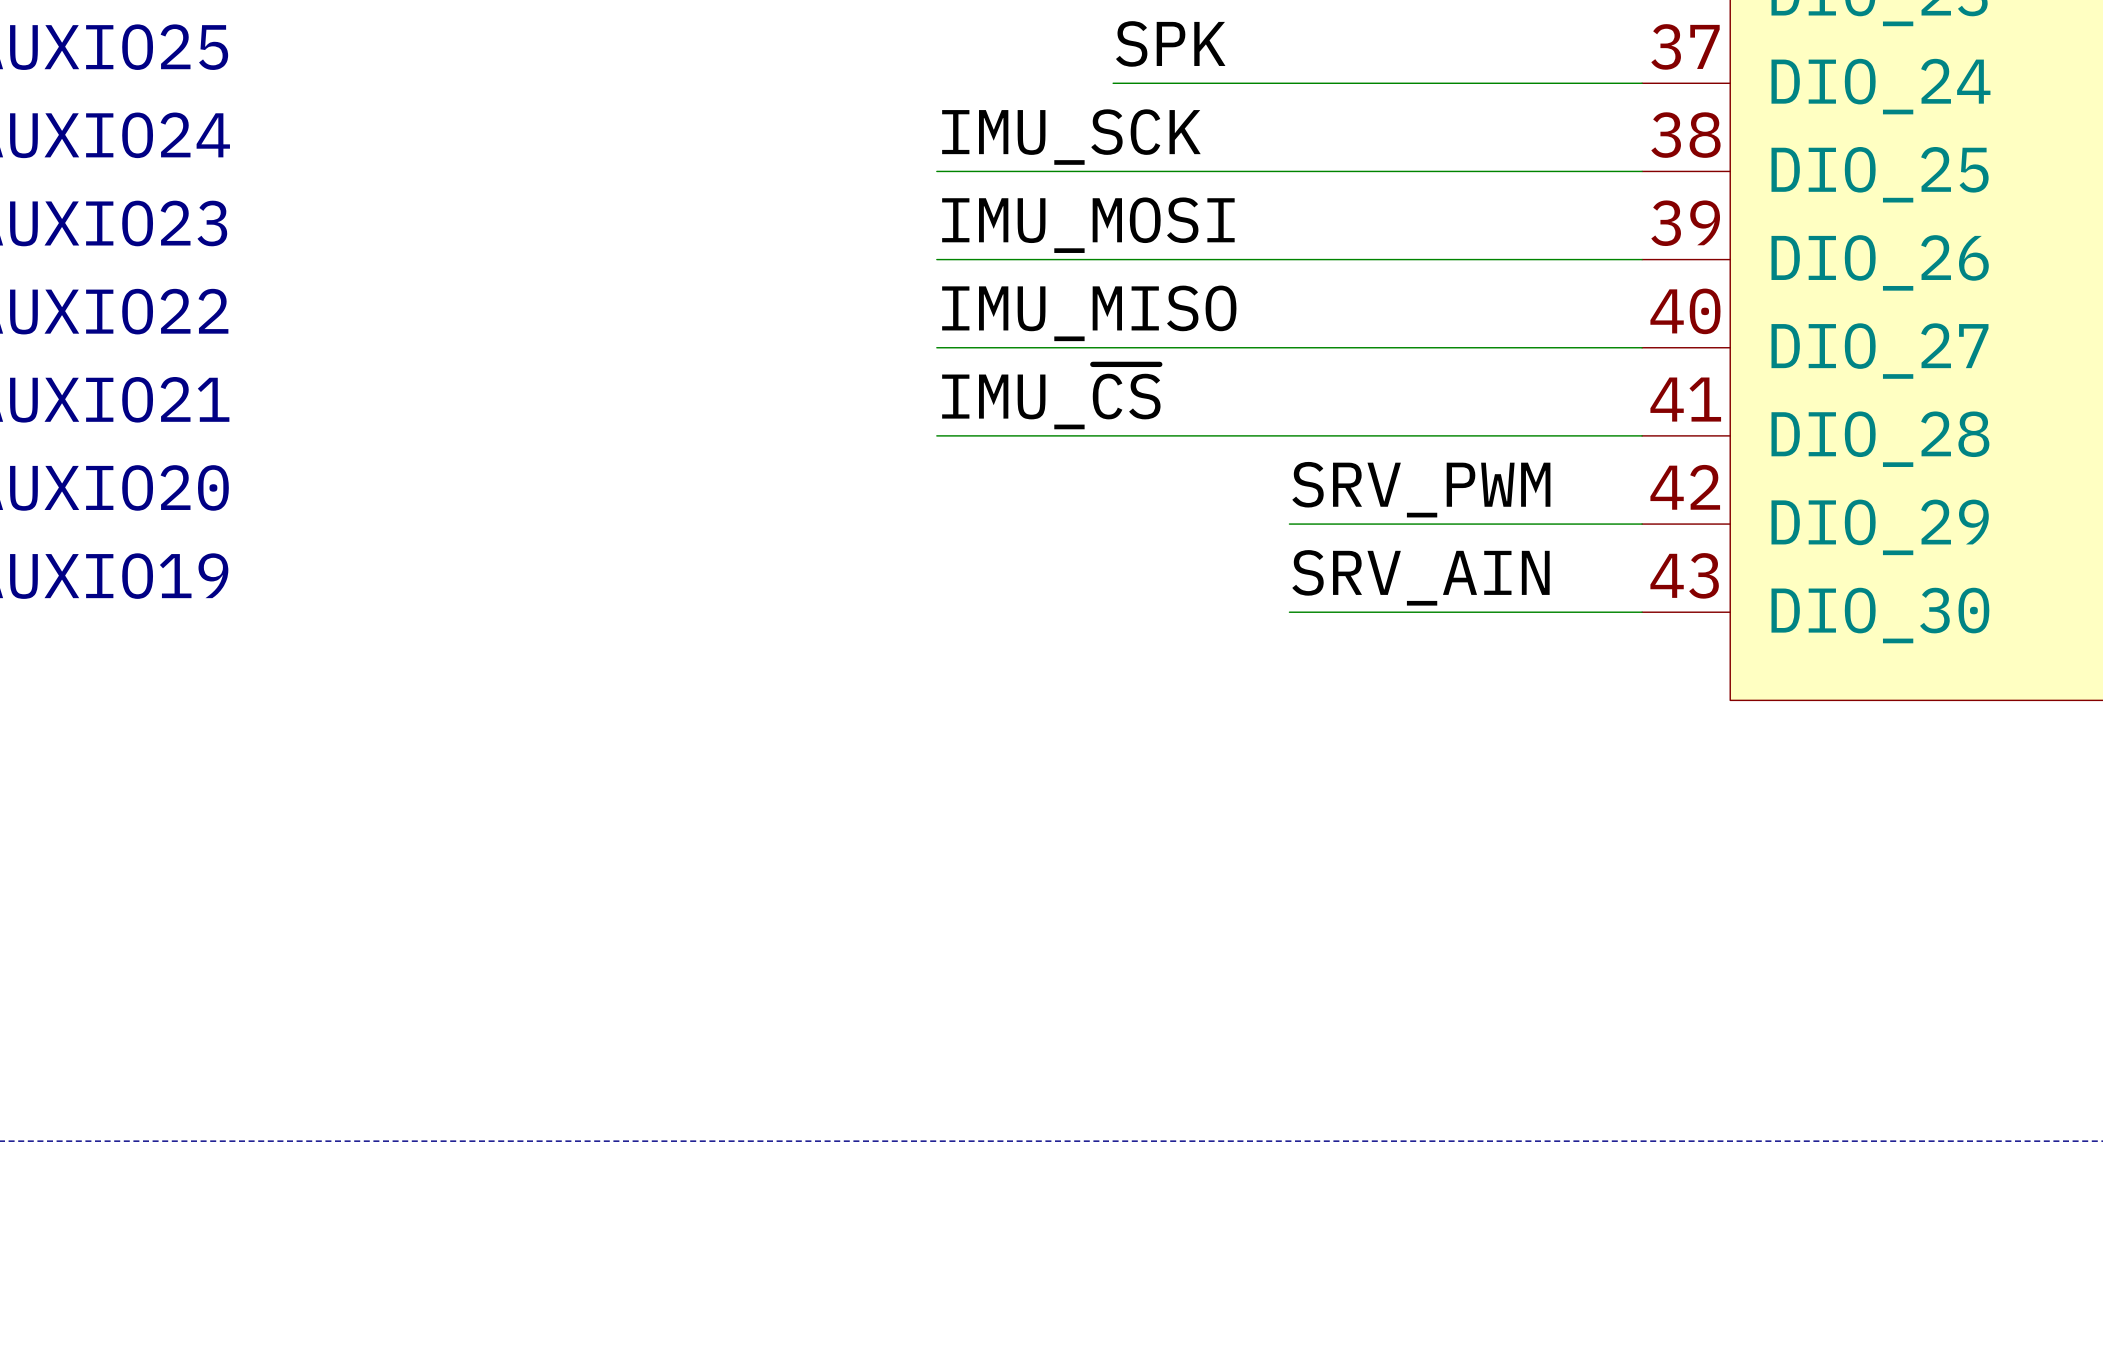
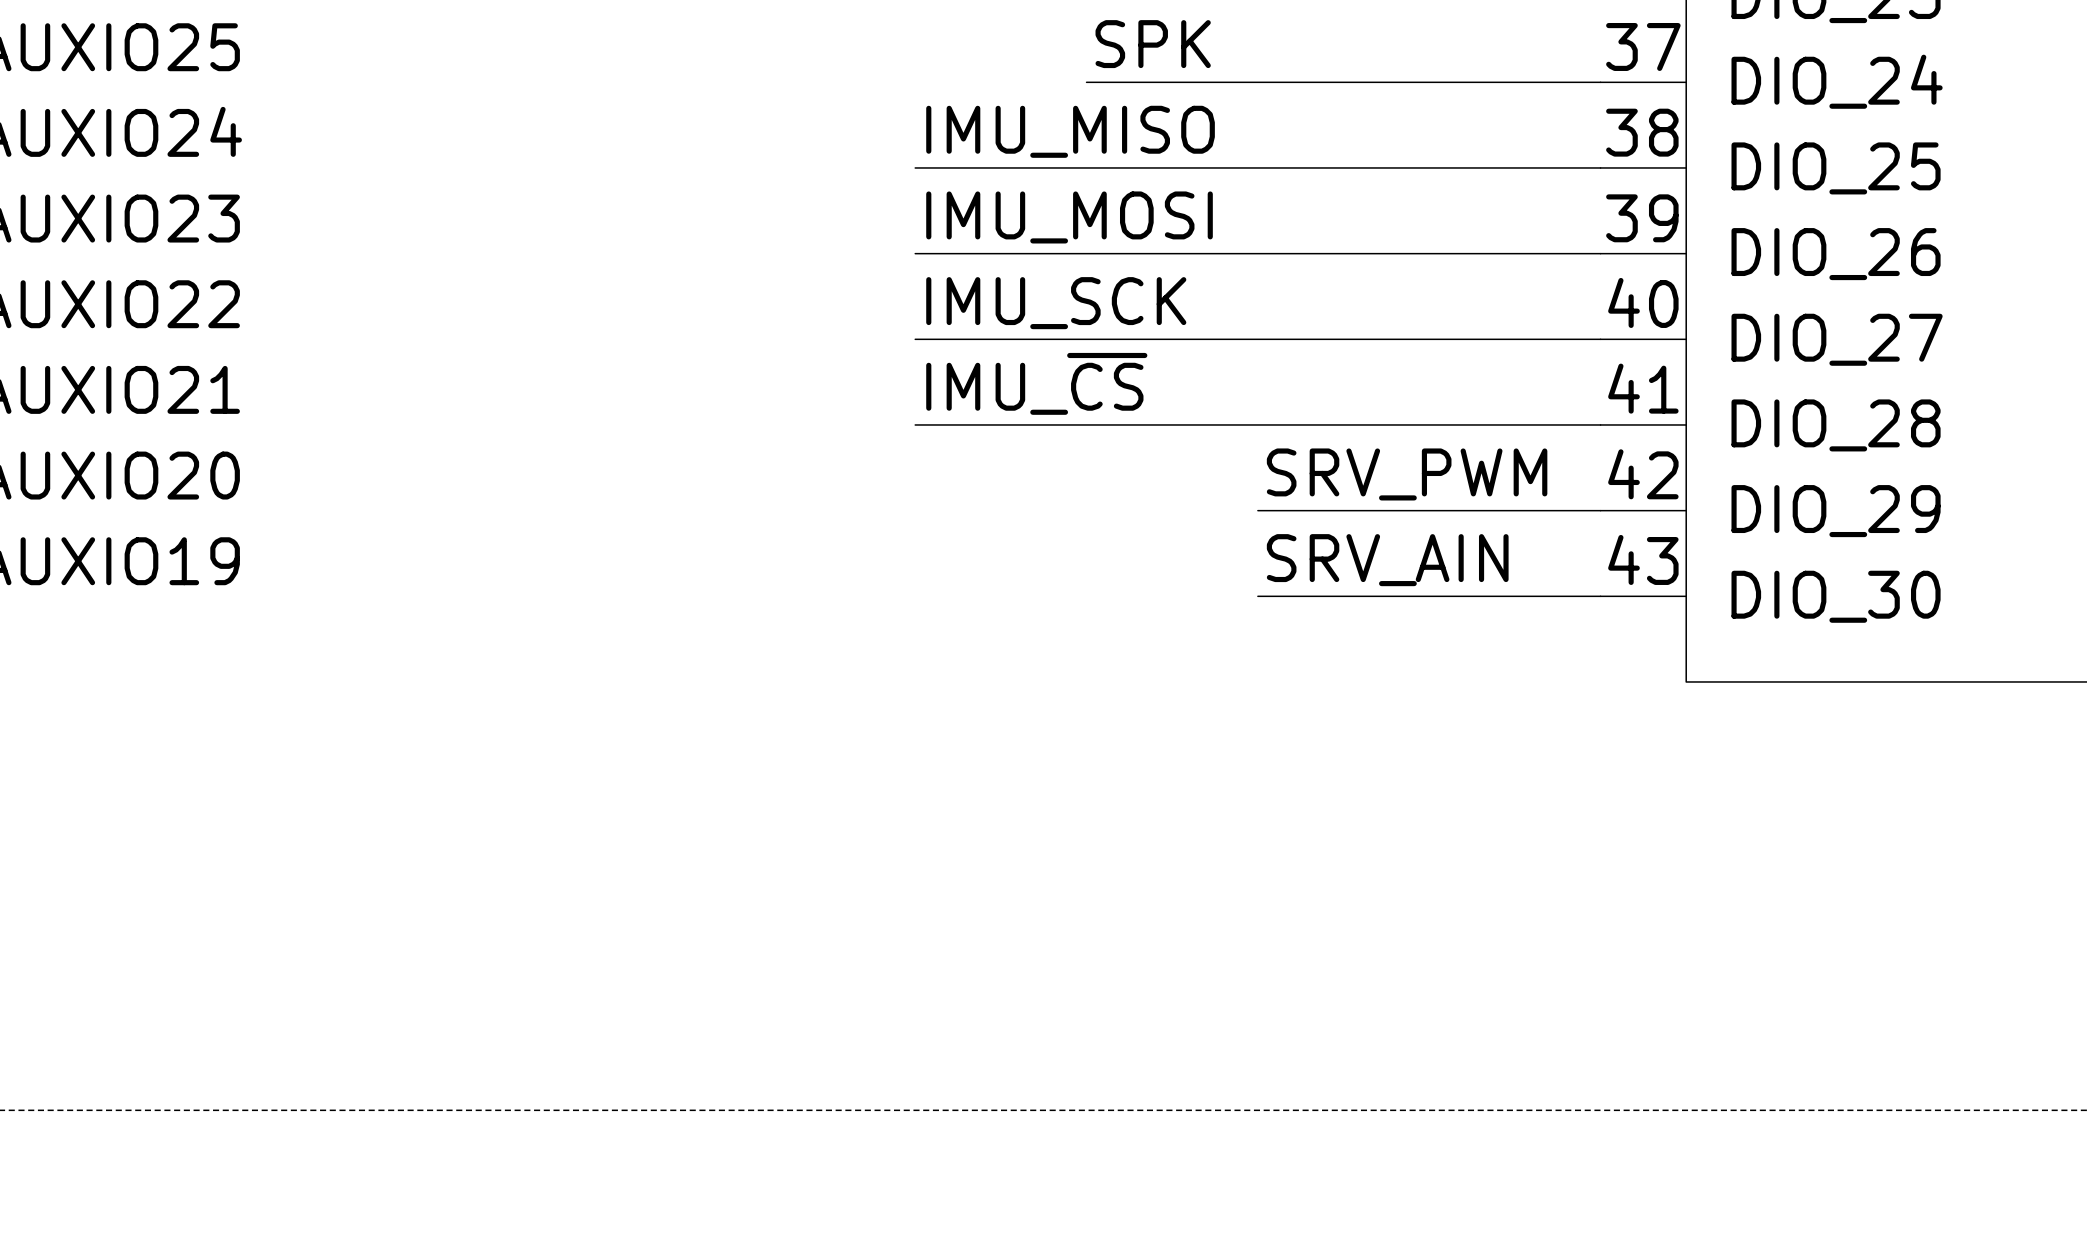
label: IMU_SCK (1071, 137) -> IMU_MISO (1070, 131)
label: IMU_MISO (1089, 313) -> IMU_SCK (1056, 303)

